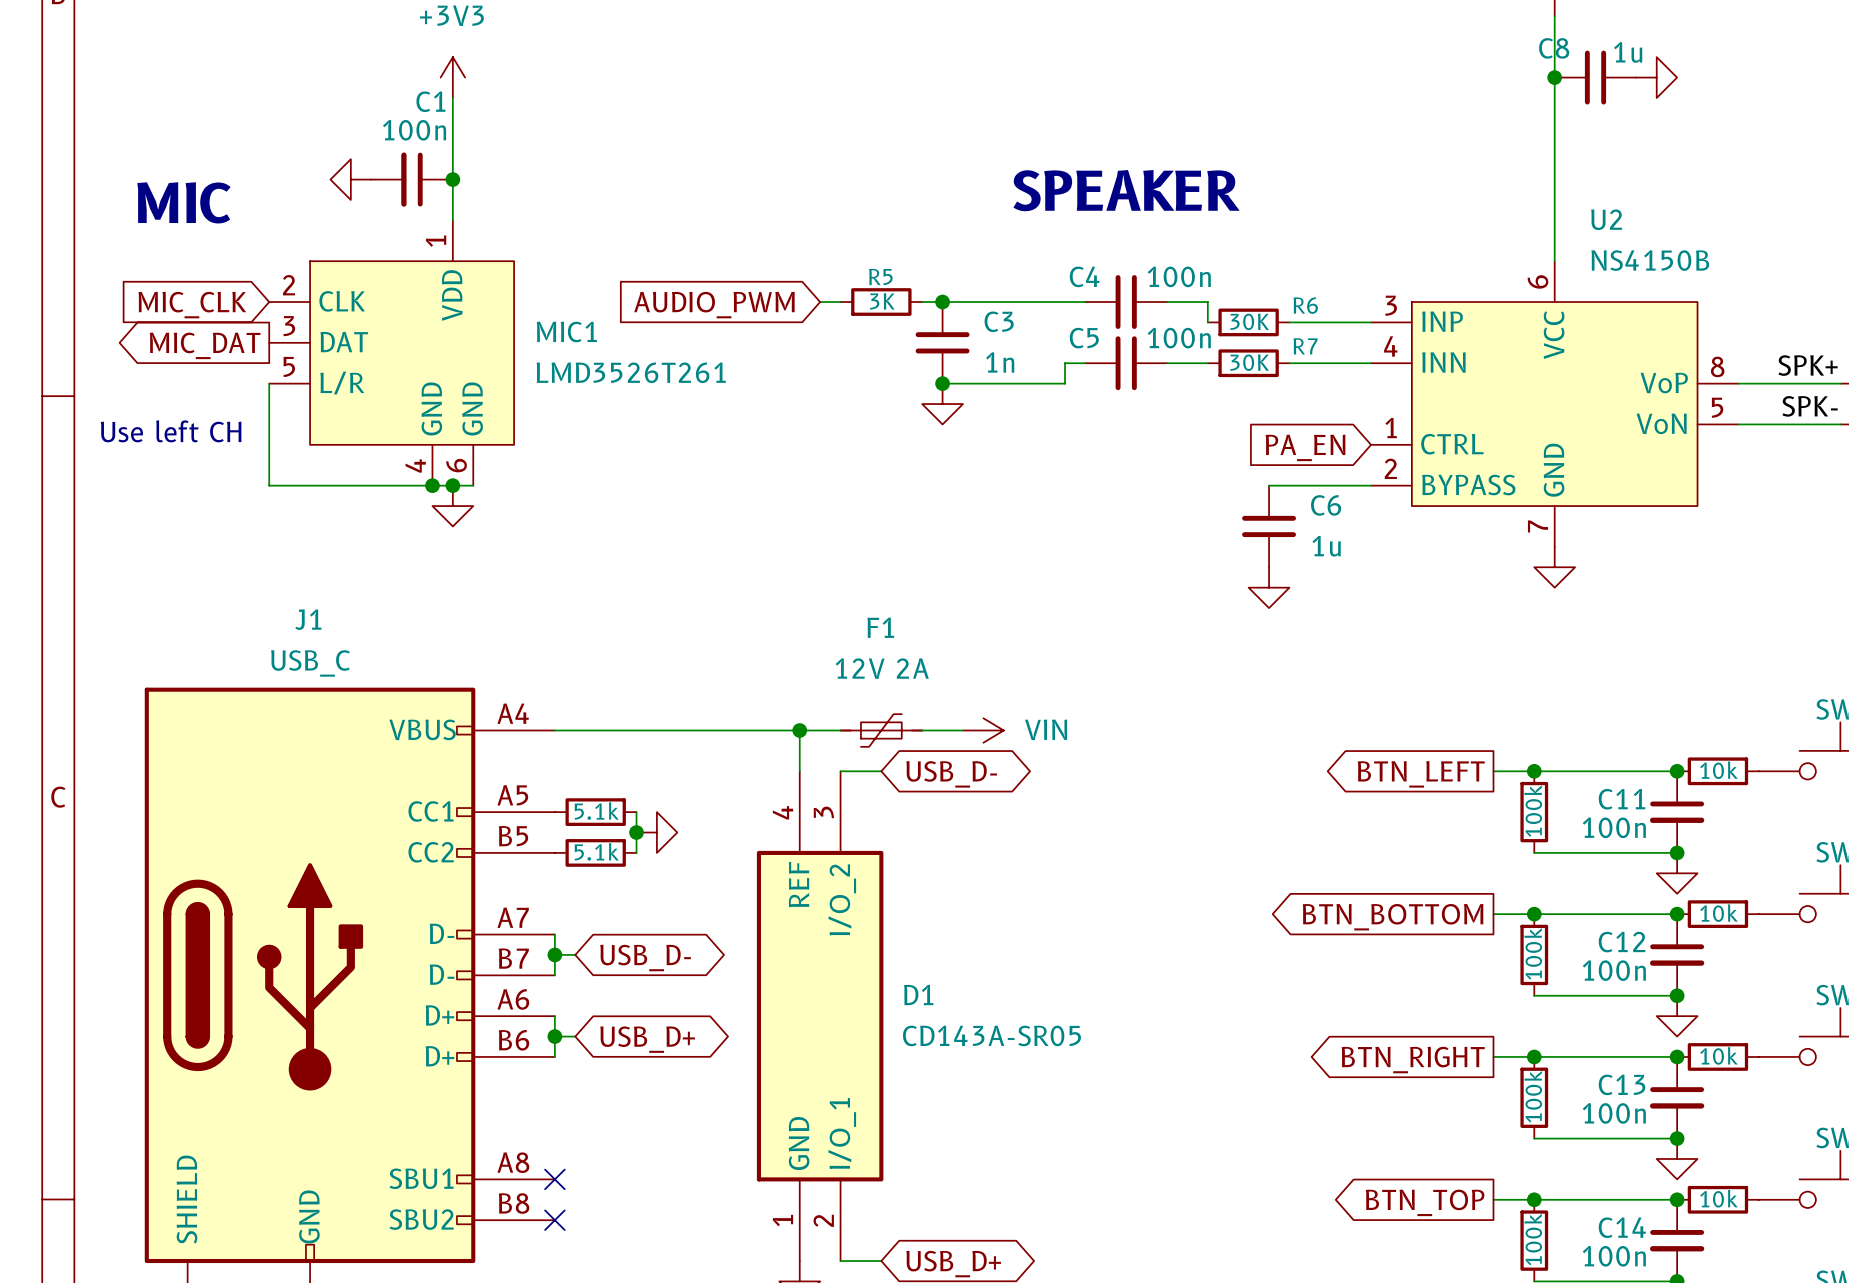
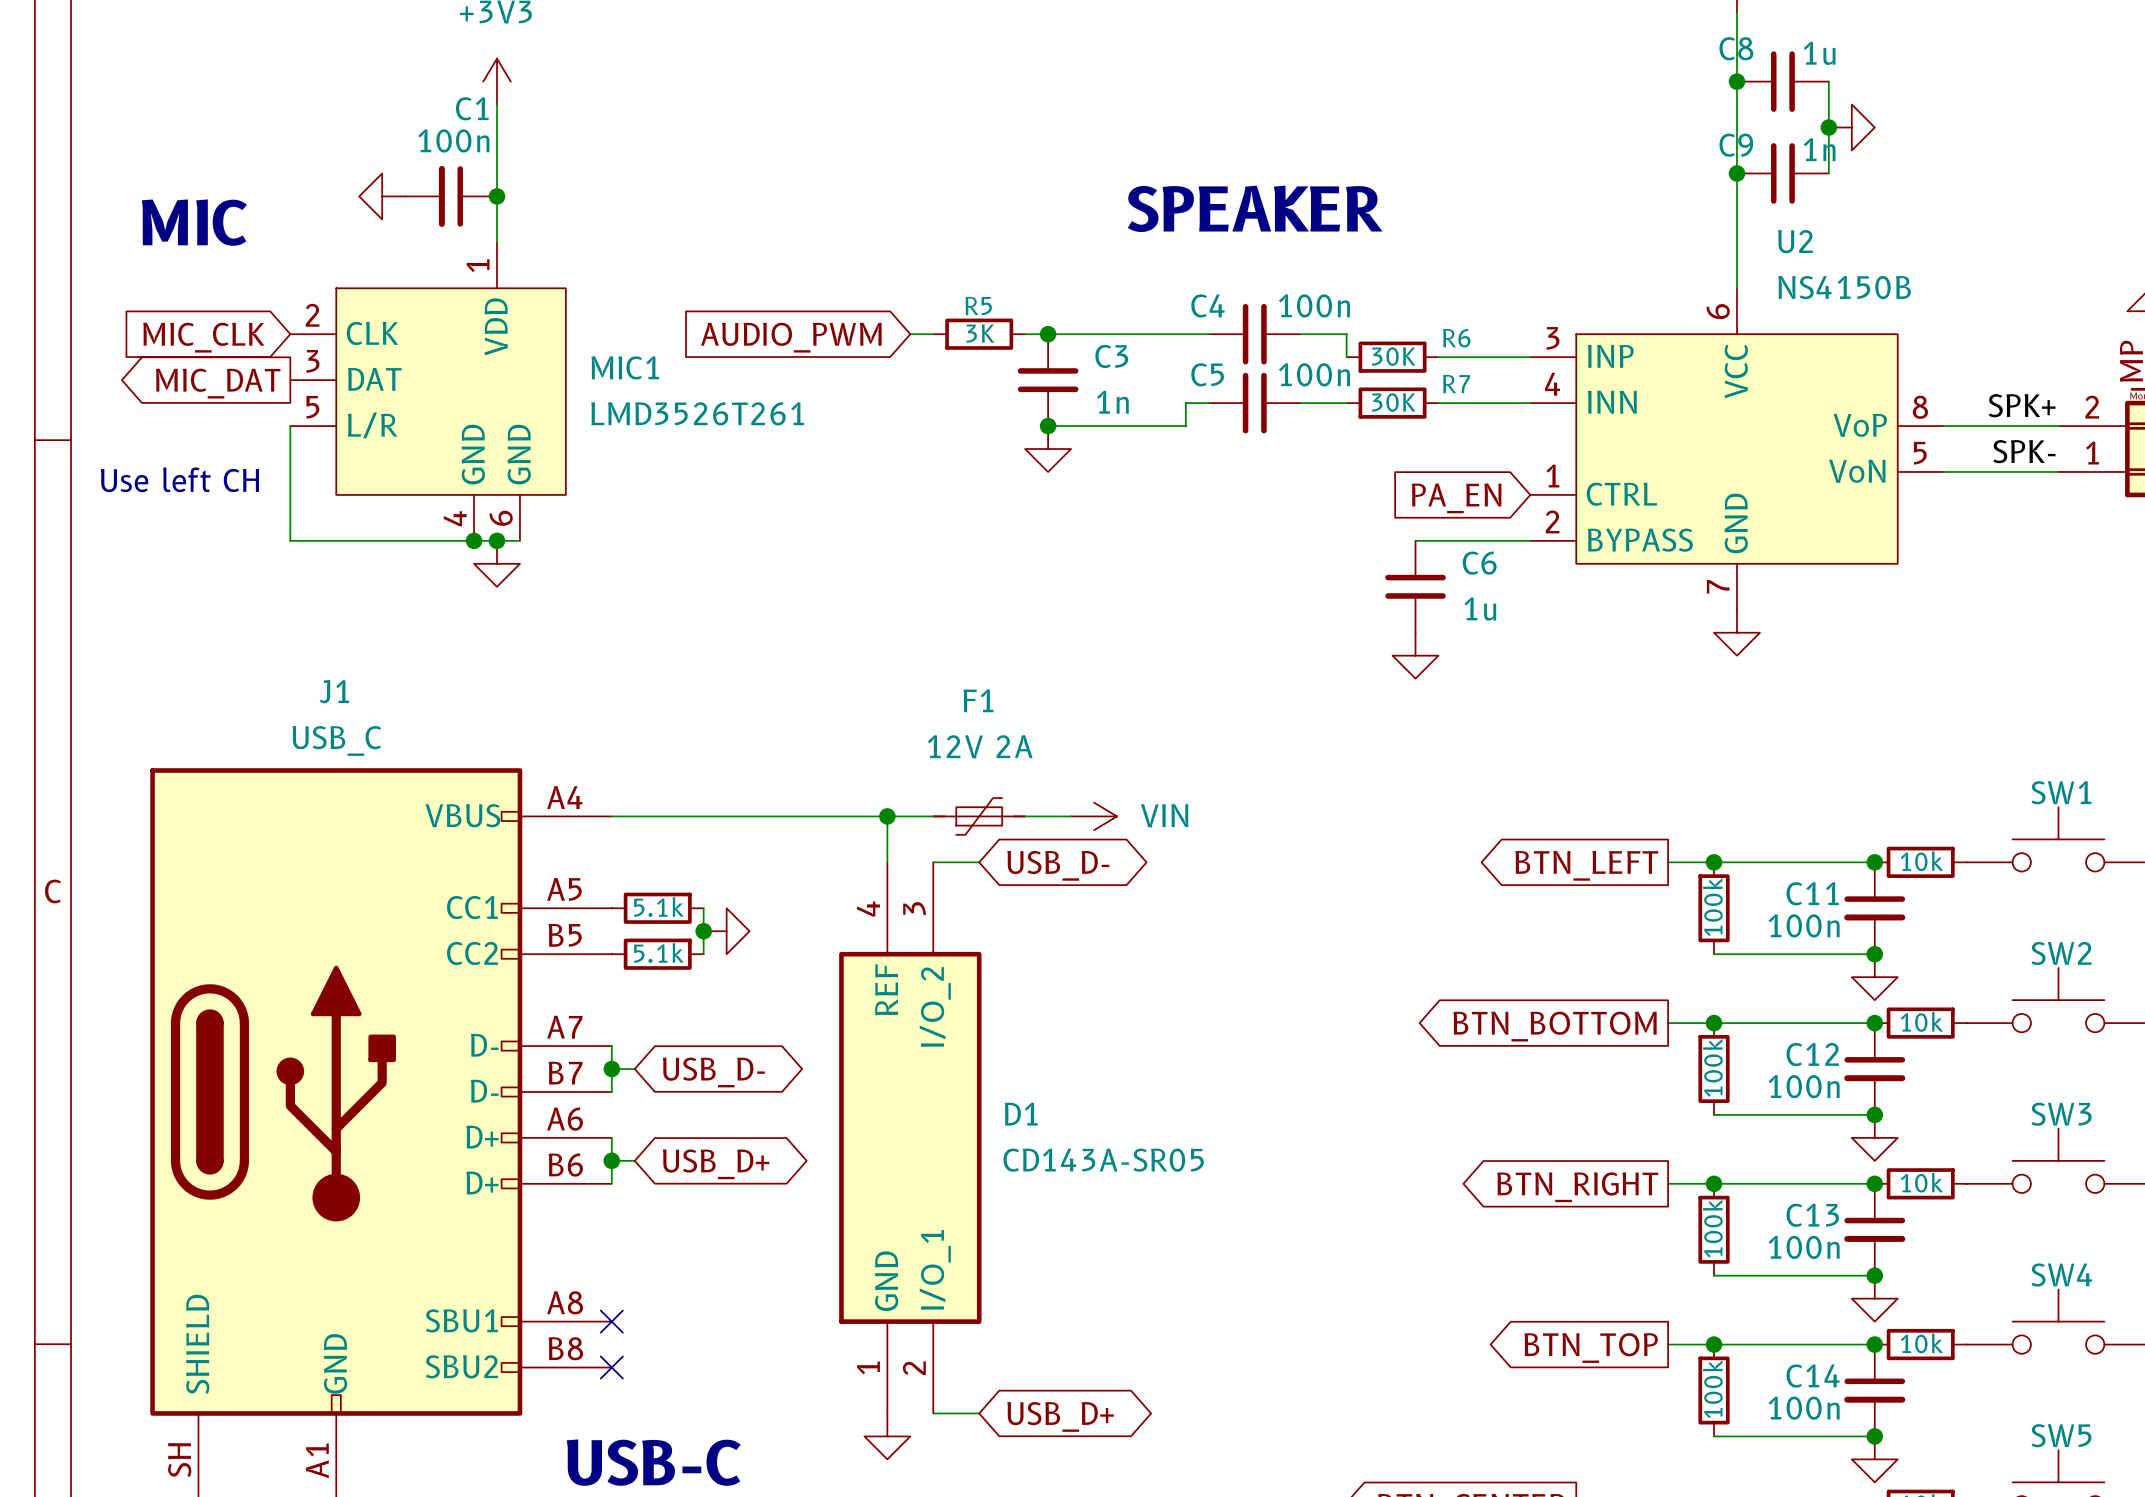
wire: none -> (1828, 81) (1828, 173)
power symbol position: (1656, 77) -> (1851, 127)
junction: none -> (1828, 127)
junction: none -> (1736, 173)
C9: none -> 1n (1782, 173)

